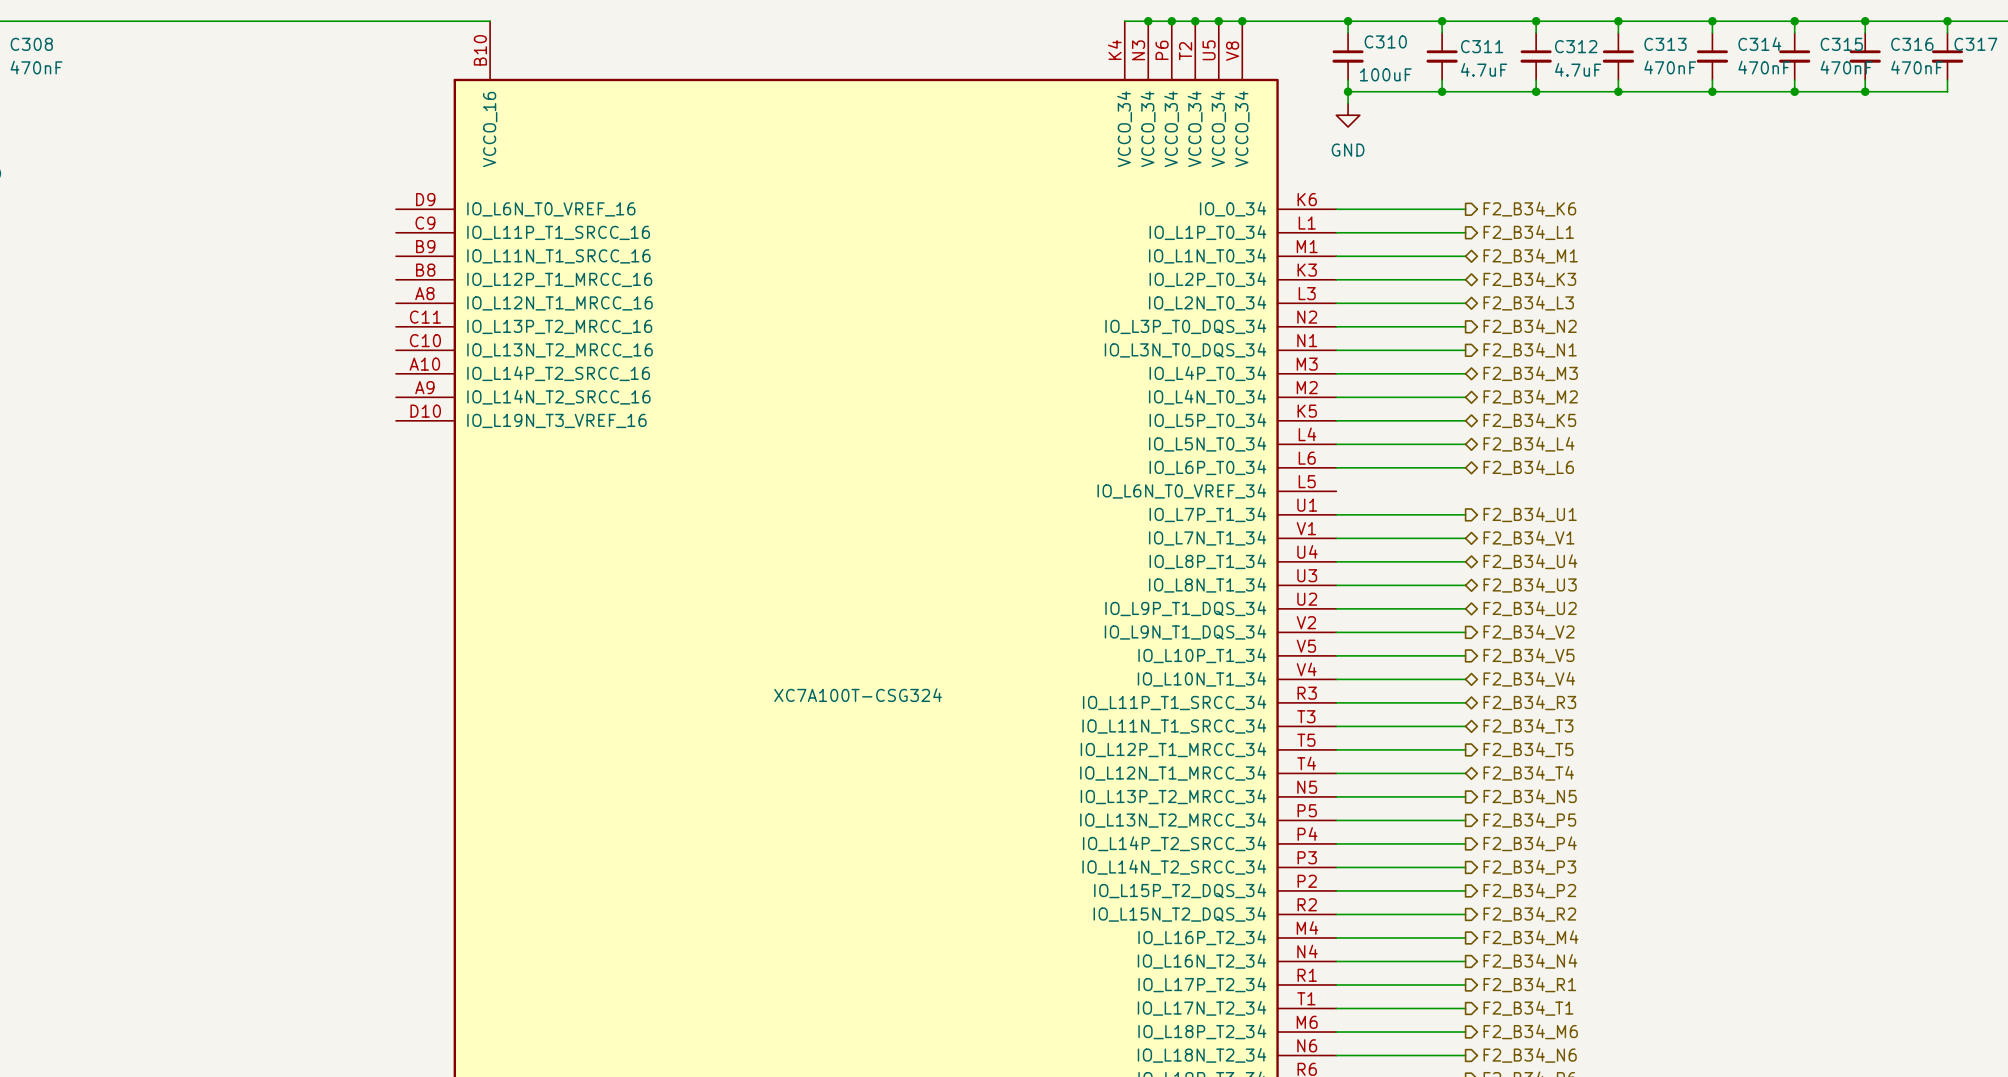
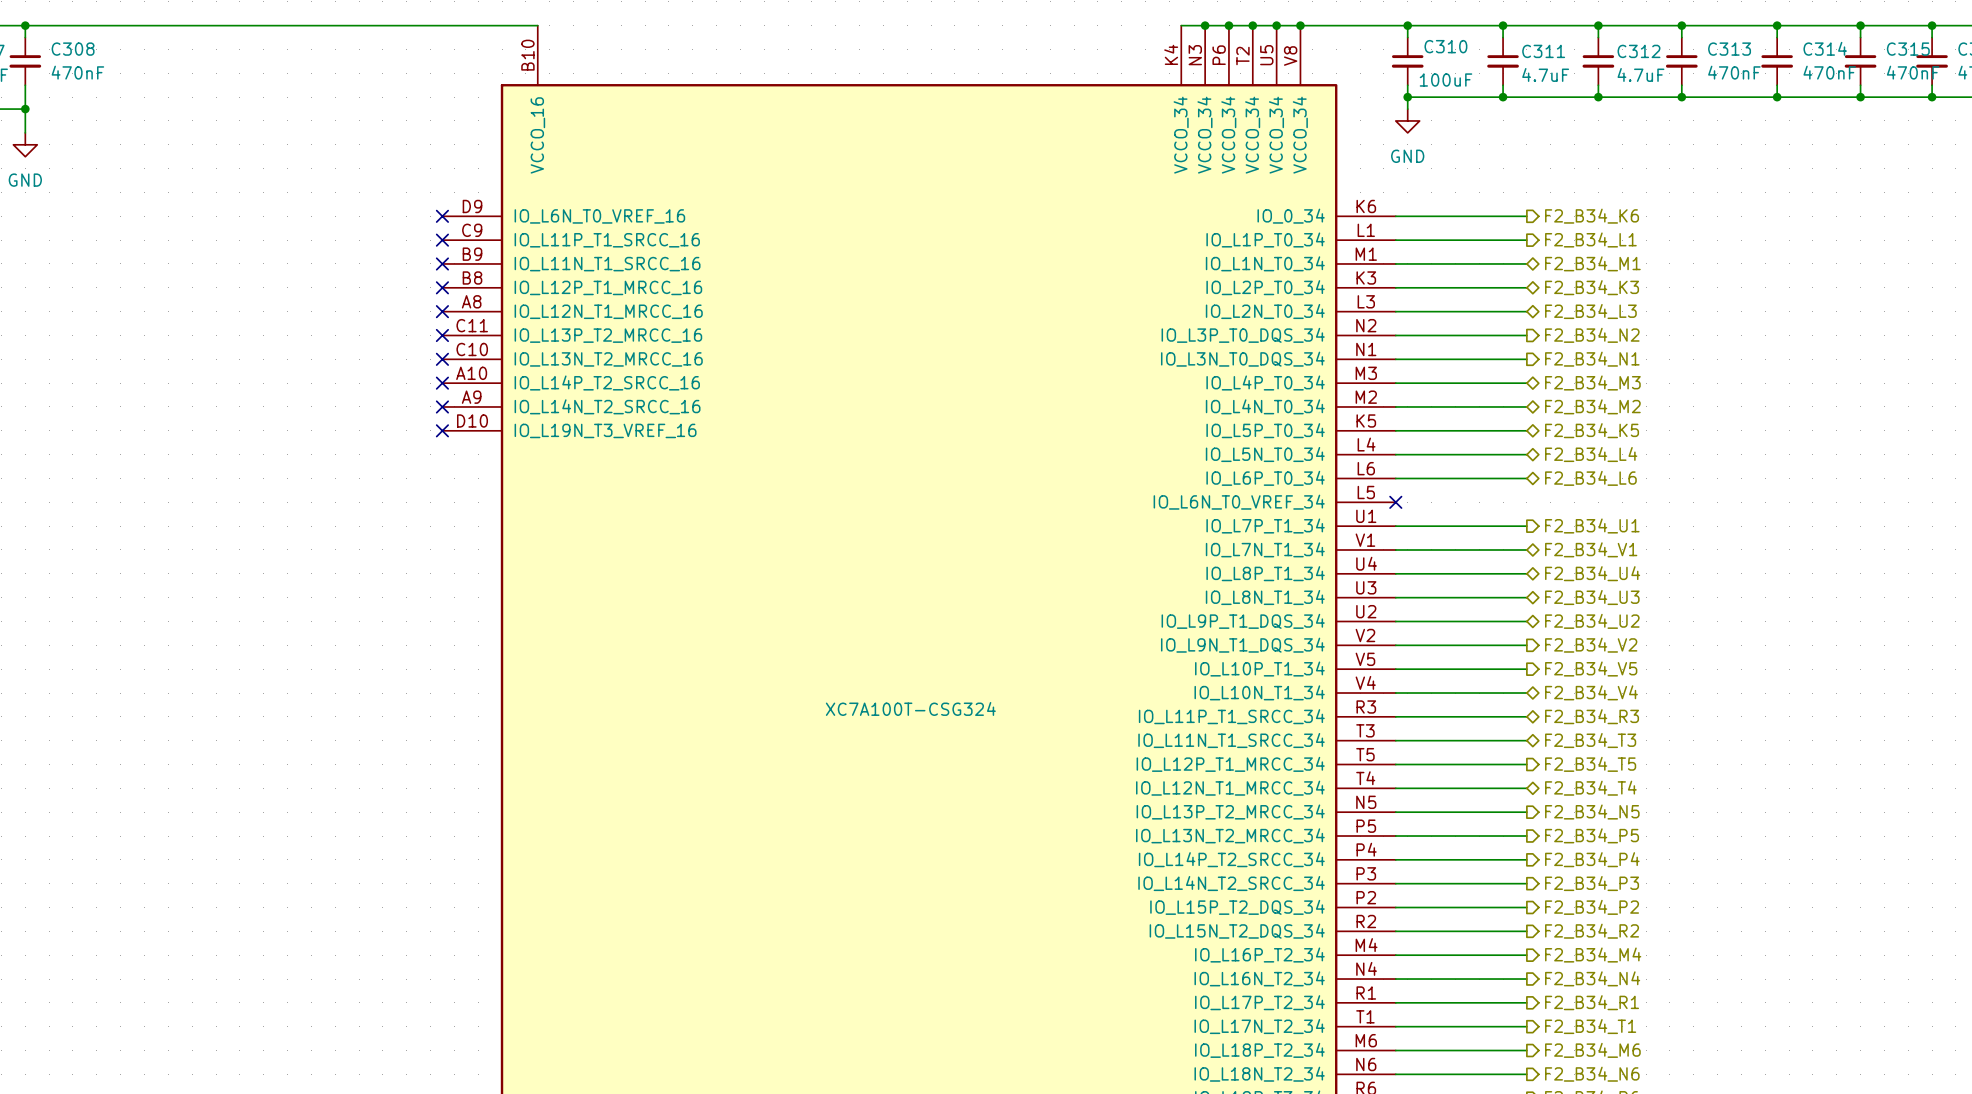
no-connect mark: none -> (442, 216)
no-connect mark: none -> (442, 240)
no-connect mark: none -> (442, 263)
no-connect mark: none -> (442, 287)
no-connect mark: none -> (442, 311)
no-connect mark: none -> (442, 335)
no-connect mark: none -> (442, 359)
no-connect mark: none -> (442, 383)
no-connect mark: none -> (442, 406)
no-connect mark: none -> (442, 430)
no-connect mark: none -> (1395, 502)

